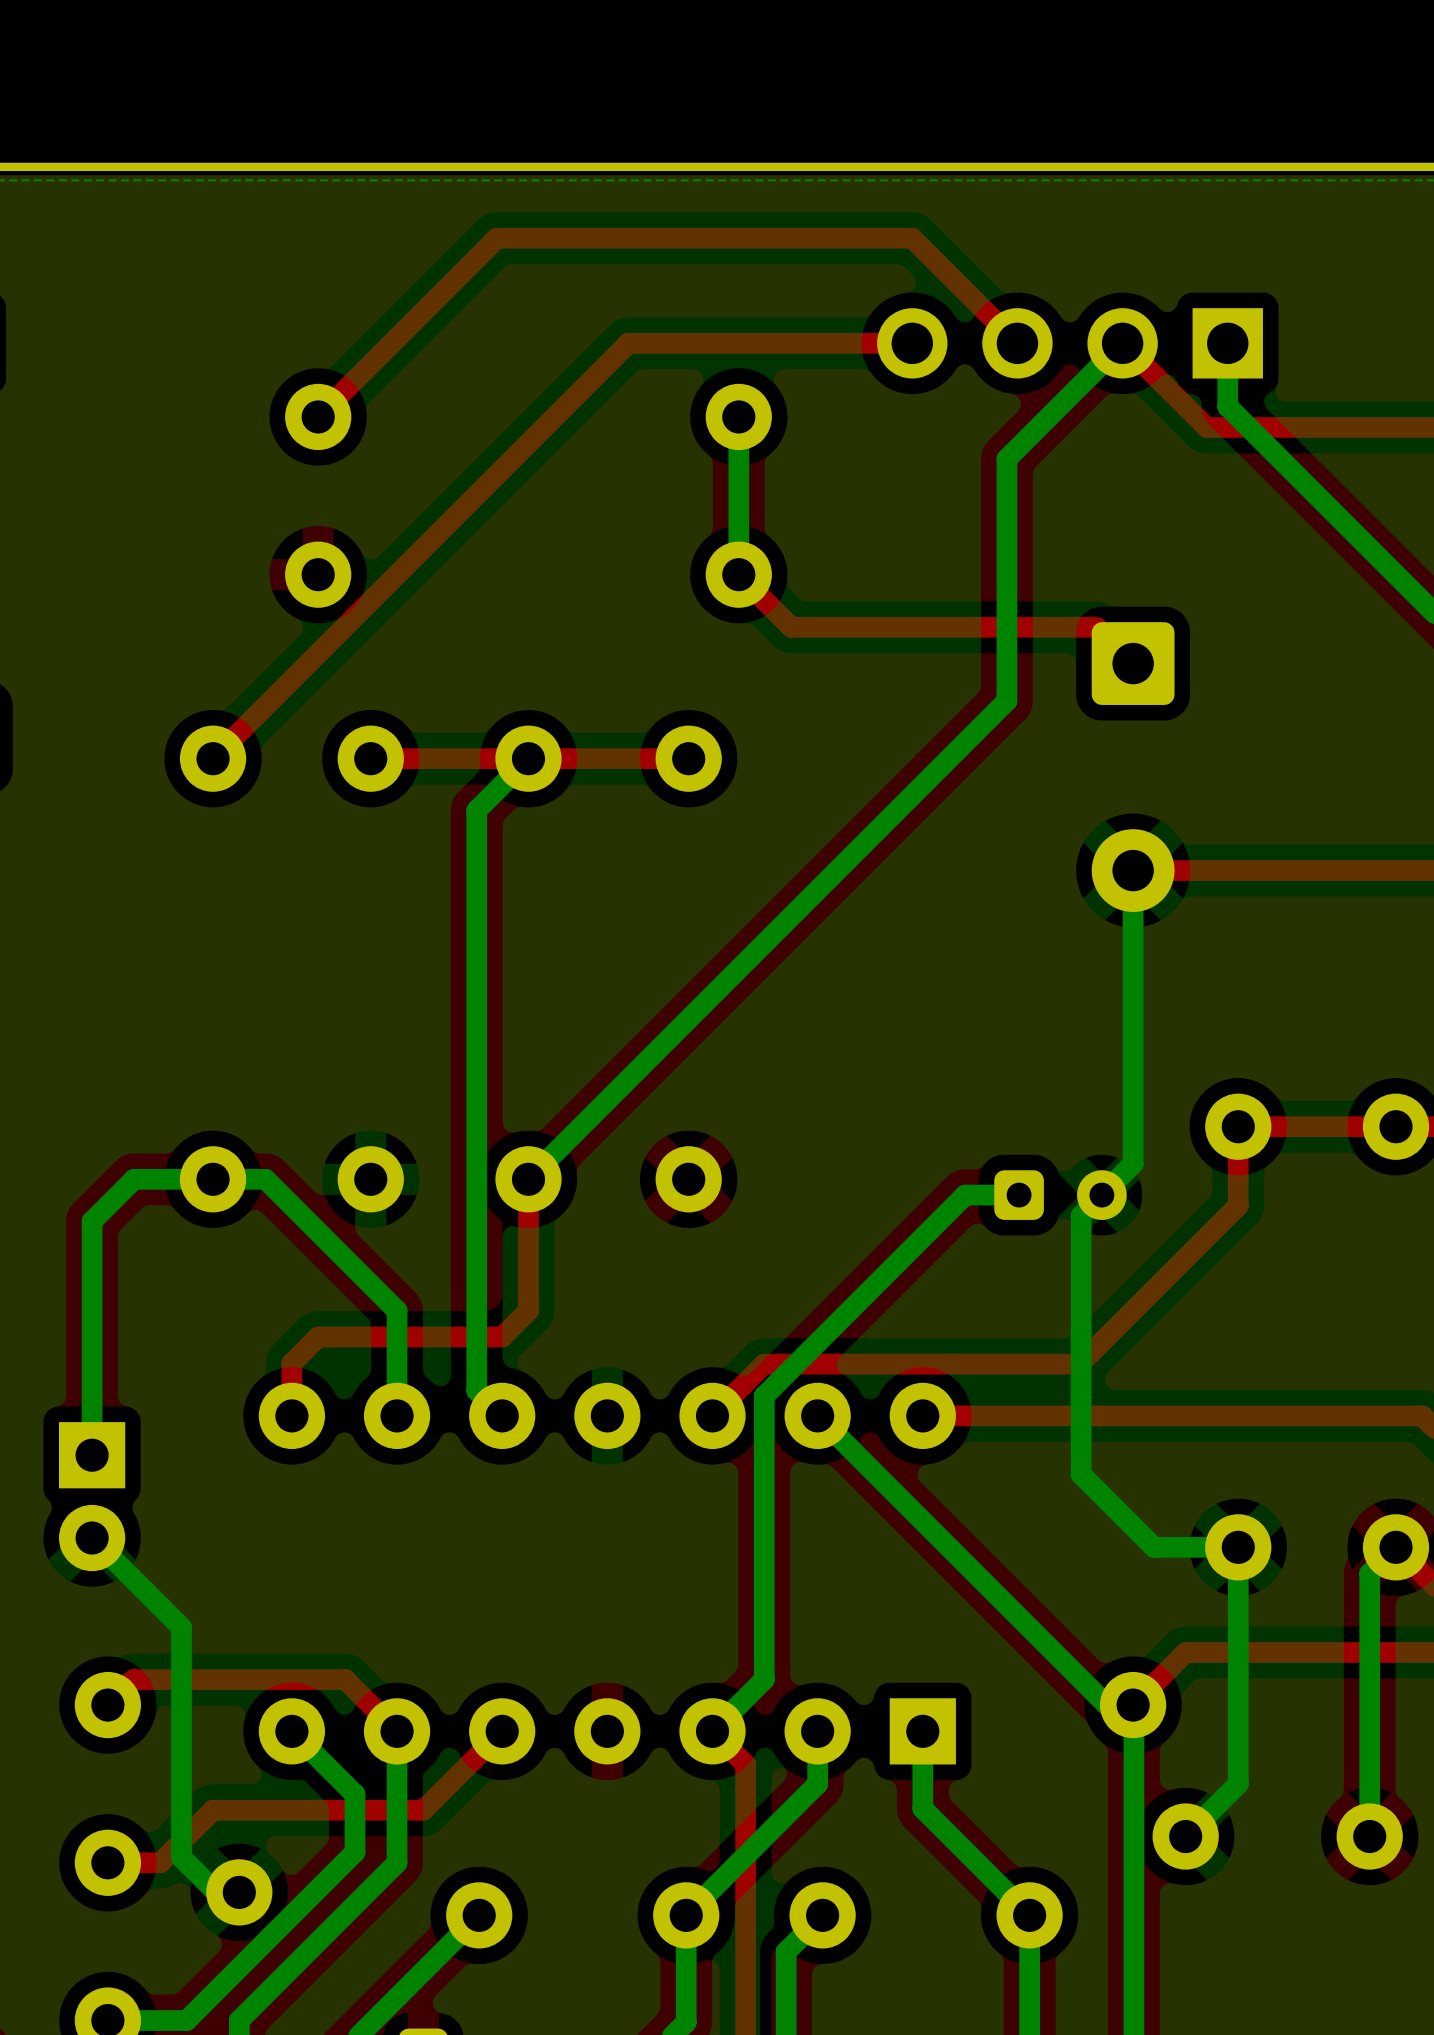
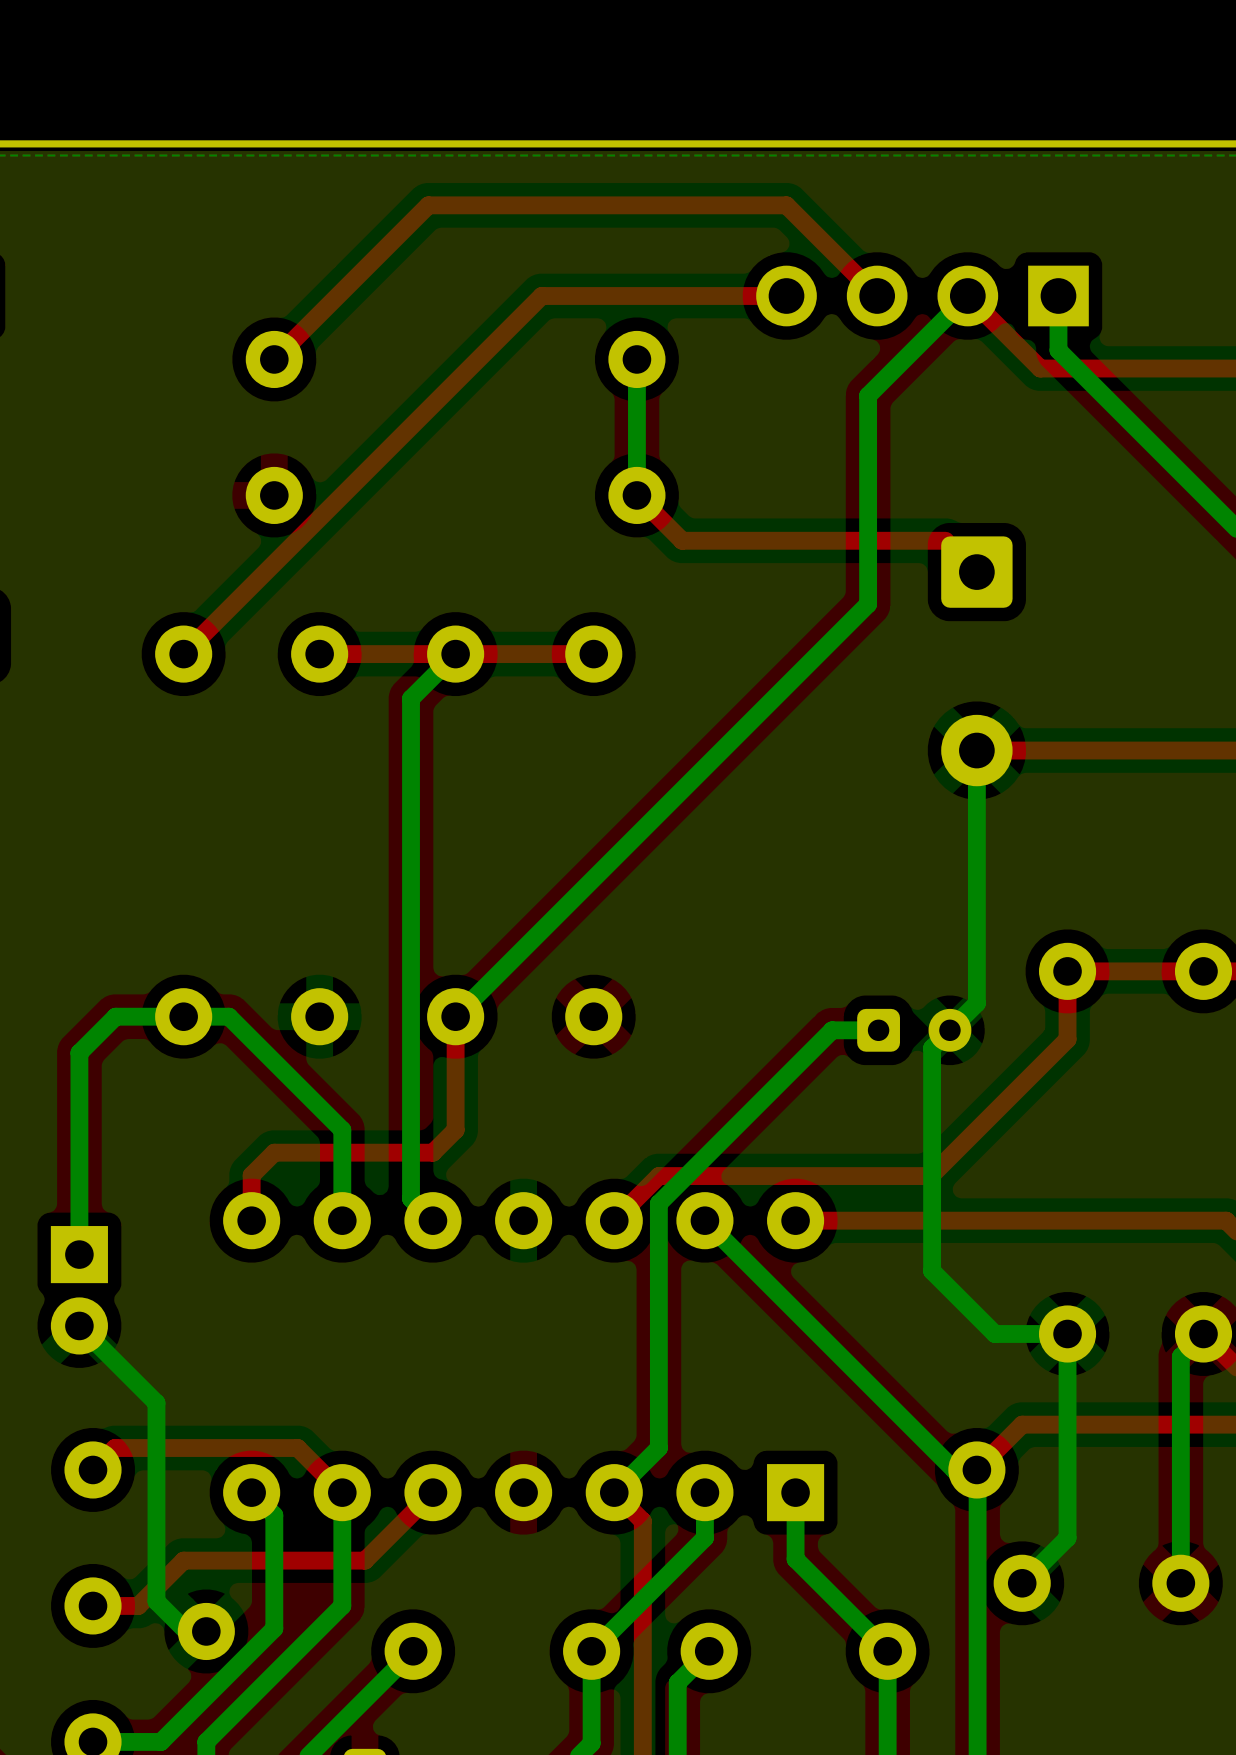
bottom track: (318, 1757) (354, 1794) (354, 1852) (318, 1889) -> (274, 1515) (274, 1628)

